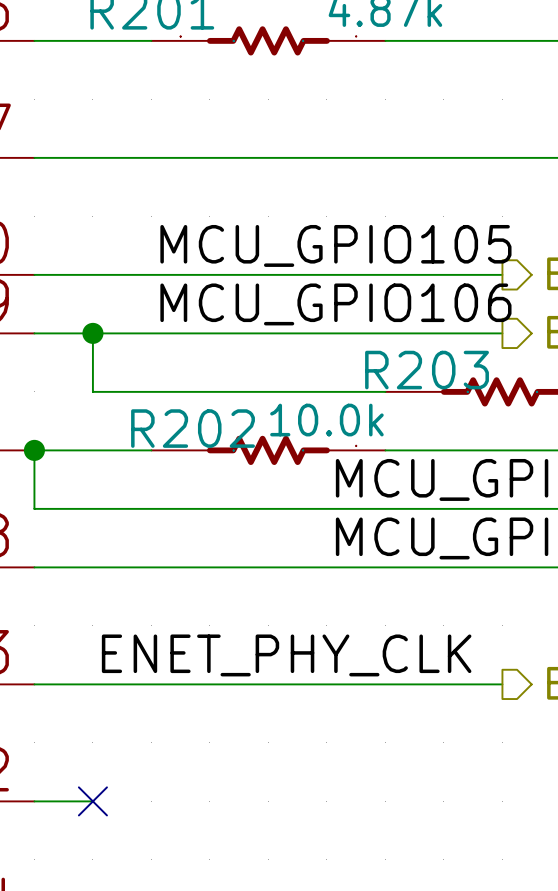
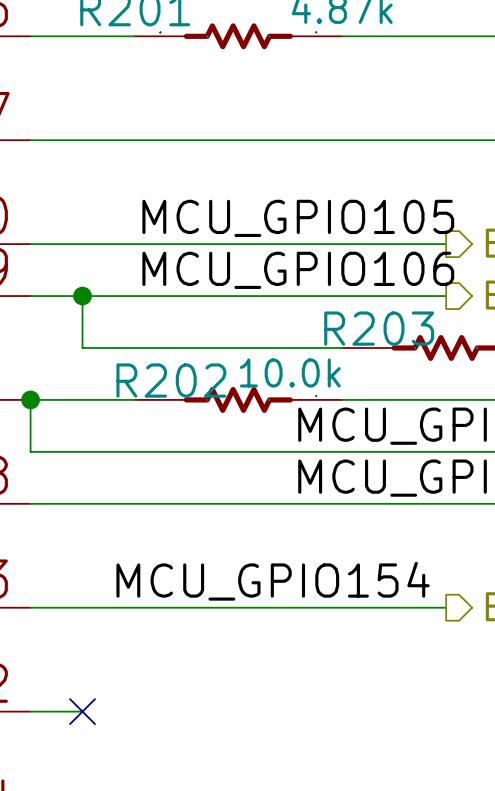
label: none -> MCU_GPIO154 (273, 581)
label: ENET_PHY_CLK (286, 655) -> none

